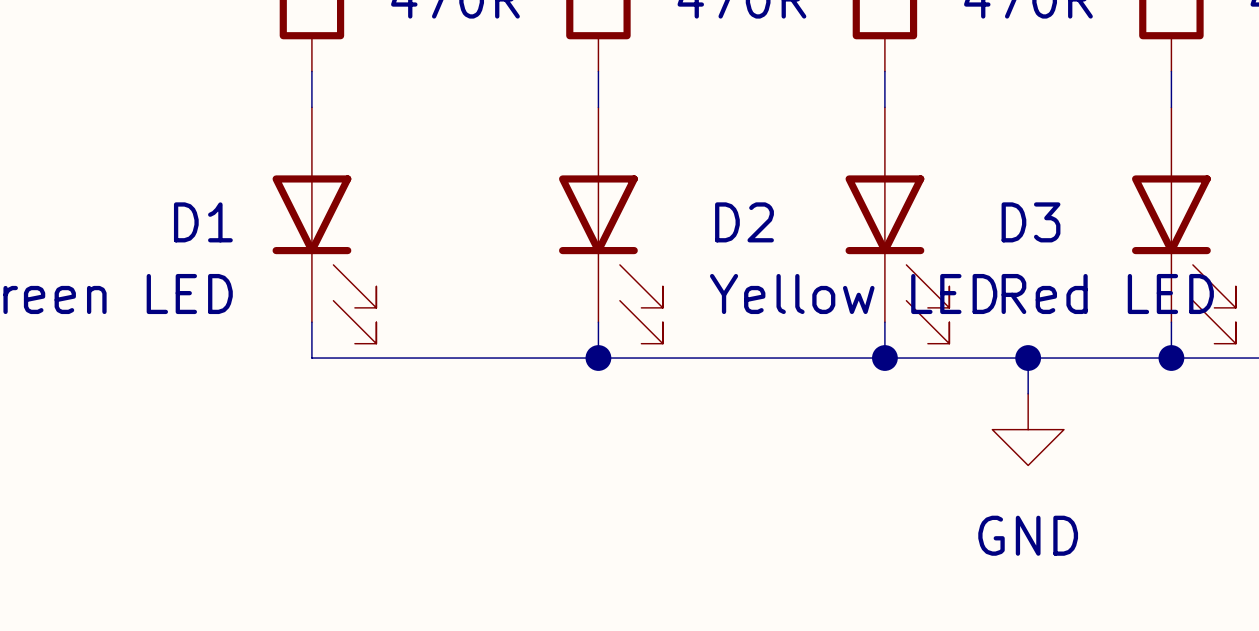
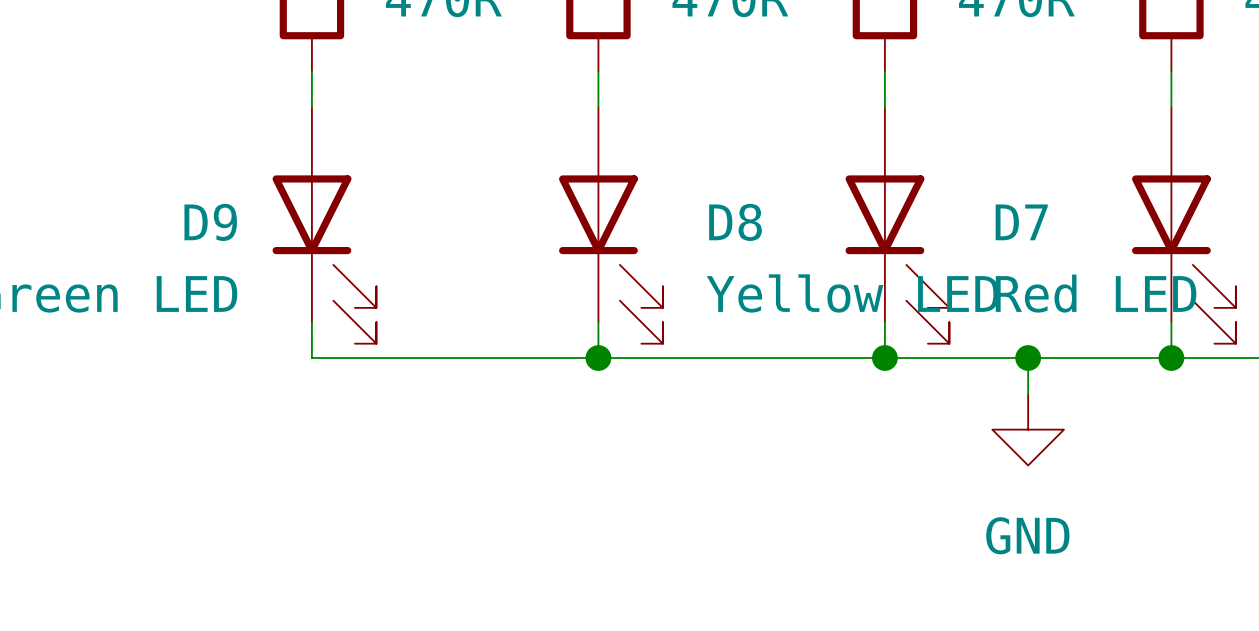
D1 name: D1 (203, 222) -> D9 (210, 222)
D2 name: D2 (744, 222) -> D8 (735, 222)
D3 name: D3 (1030, 222) -> D7 (1021, 222)

